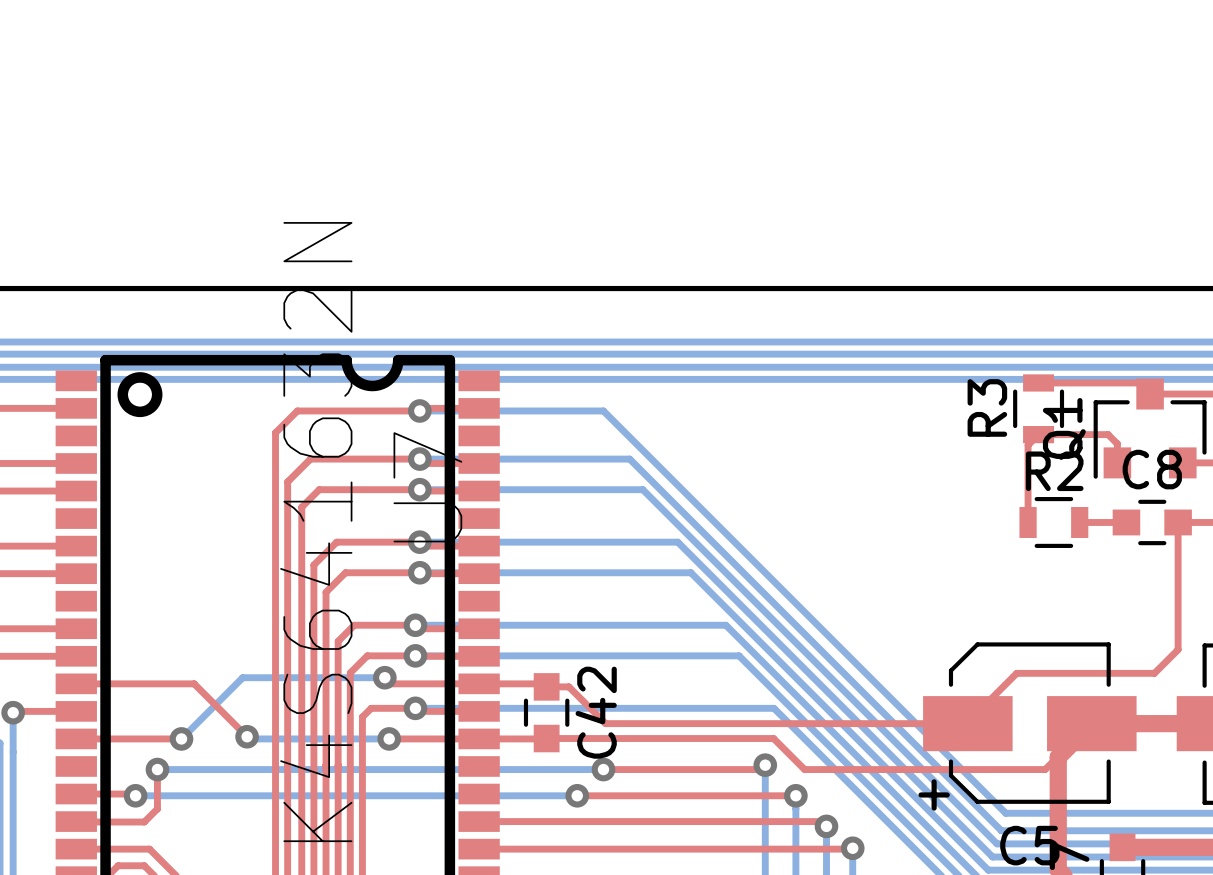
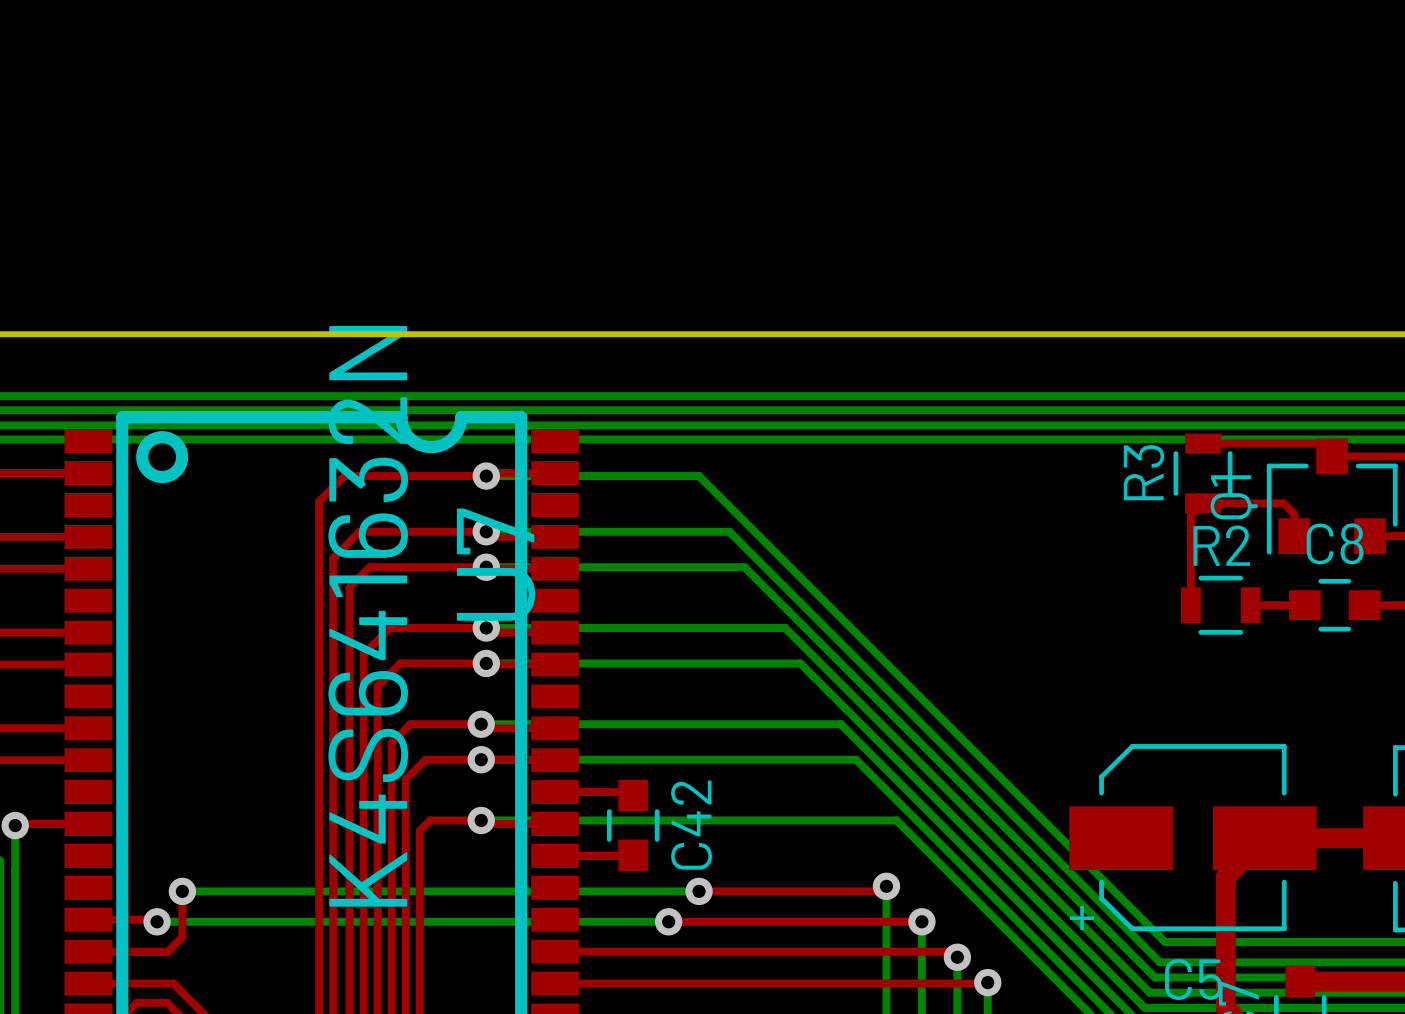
top track: (1178, 522) (1178, 649) (1154, 673) (1016, 673) (967, 723) (605, 723) (568, 686) (546, 686) -> none
top track: (384, 677) (390, 683) (479, 683) -> none
bottom track: (384, 677) (242, 677) (181, 738) -> none
via: (384, 677) -> none
top track: (76, 683) (194, 683) (247, 736) -> none
top track: (1091, 723) (1045, 769) (804, 769) (773, 738) (546, 738) -> none
bottom track: (247, 736) (249, 738) (389, 738) -> none
via: (247, 736) -> none
top track: (76, 738) (181, 738) -> none
via: (181, 738) -> none
top track: (389, 738) (479, 738) -> none
via: (389, 738) -> none

